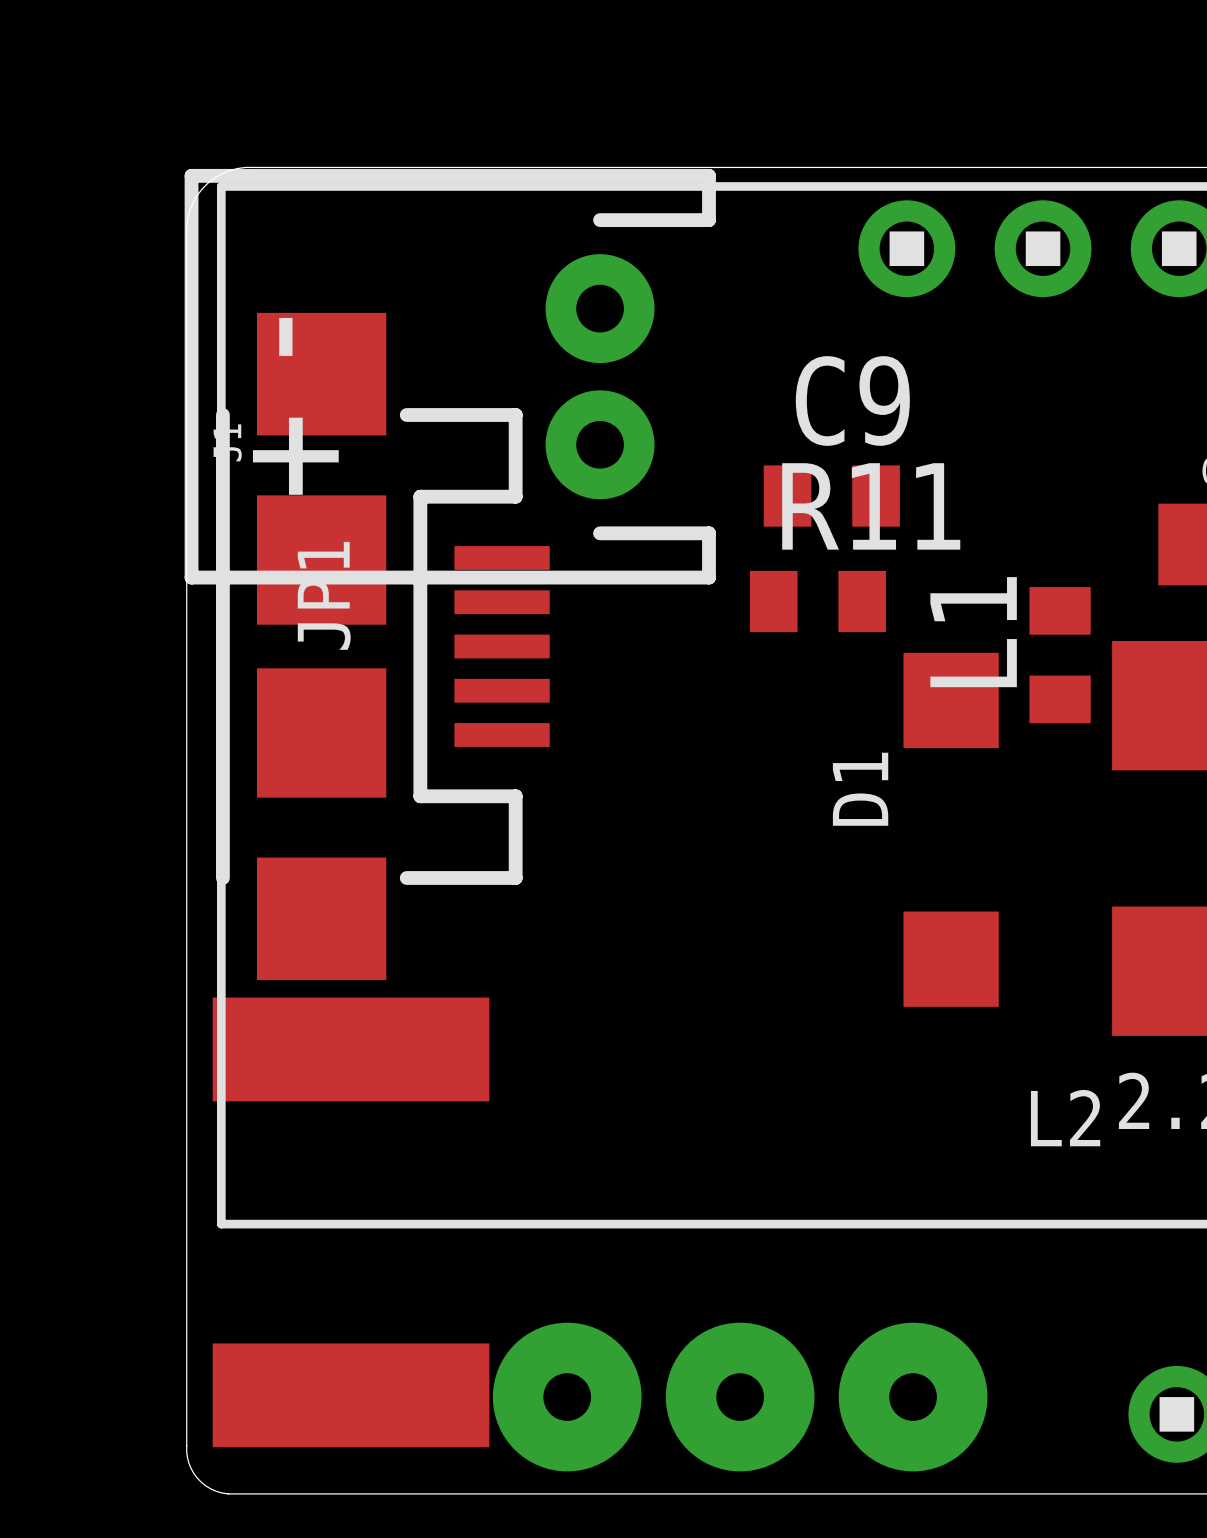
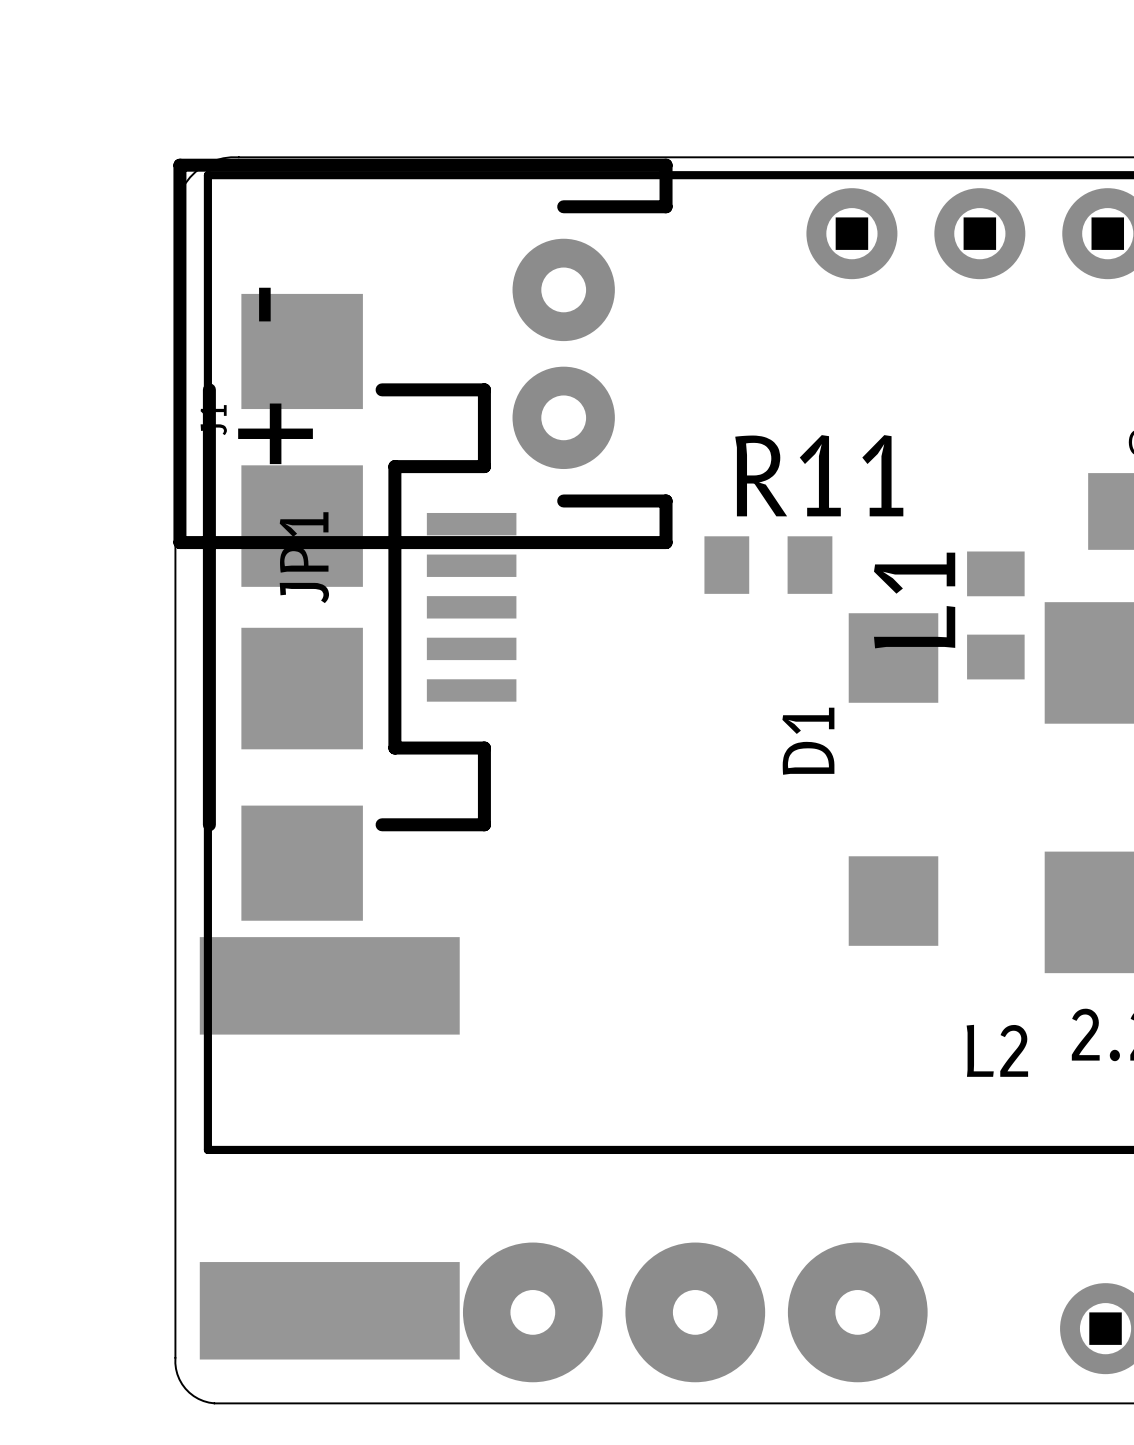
C9: (831, 496) -> none

